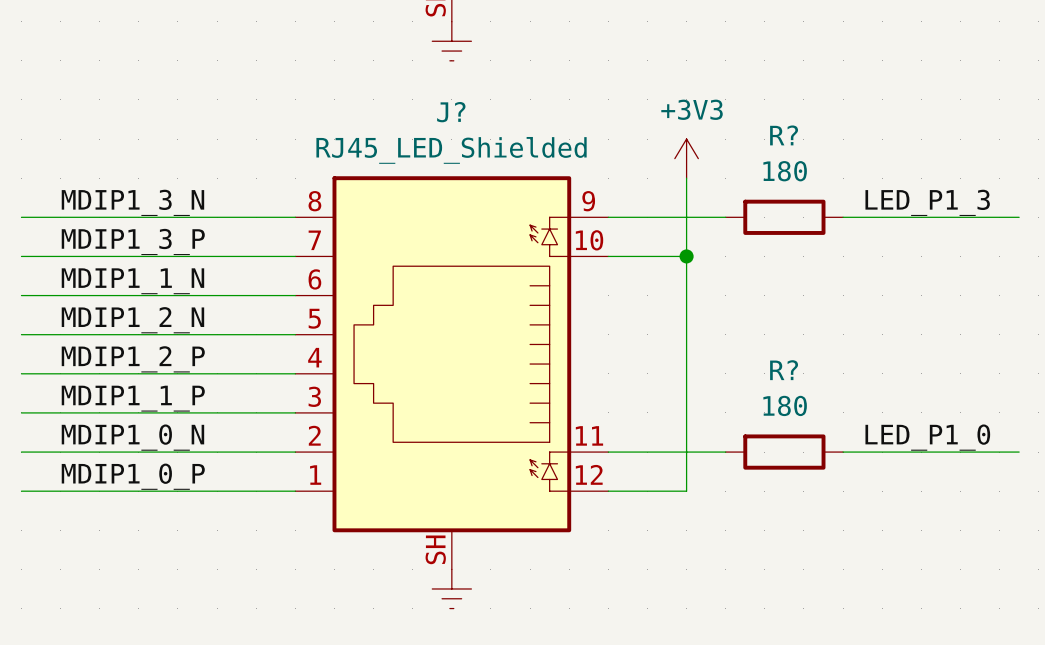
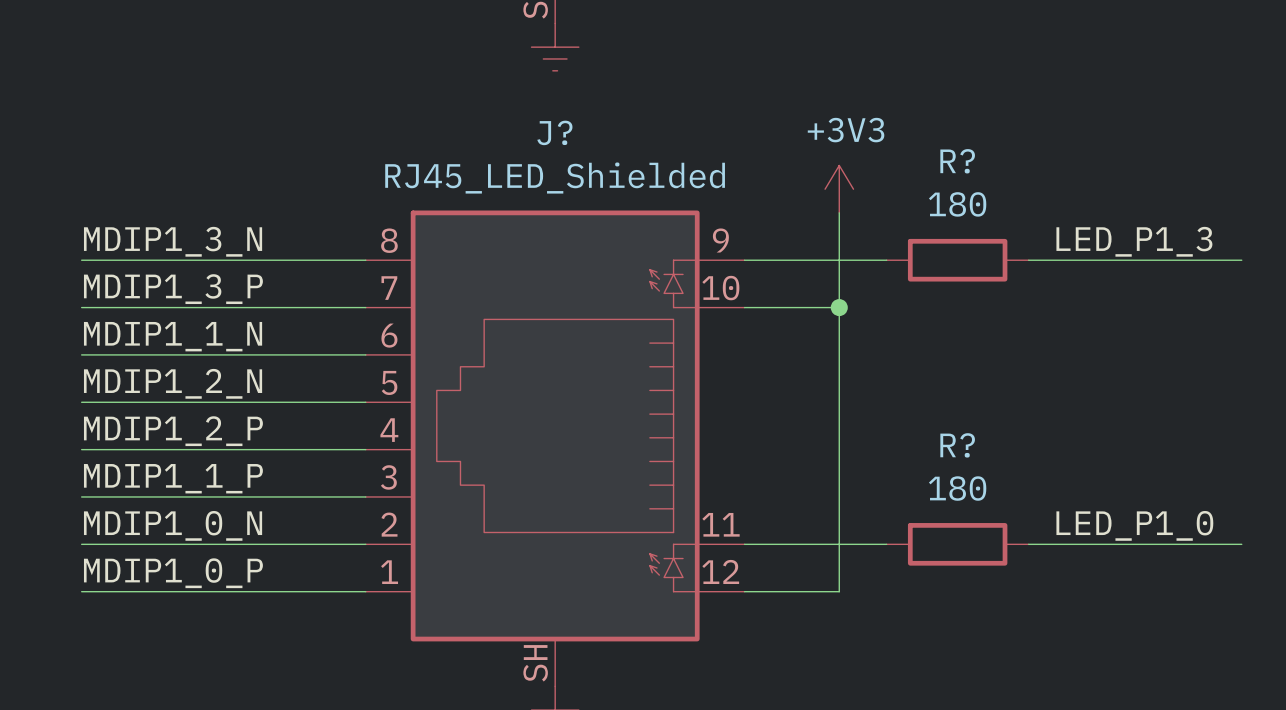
wire: (21, 217) (60, 217) -> none
wire: (21, 256) (60, 256) -> none
wire: (21, 295) (60, 295) -> none
wire: (21, 334) (60, 334) -> none
wire: (21, 373) (60, 373) -> none
wire: (21, 412) (60, 412) -> none
wire: (21, 452) (60, 452) -> none
wire: (21, 491) (60, 491) -> none

